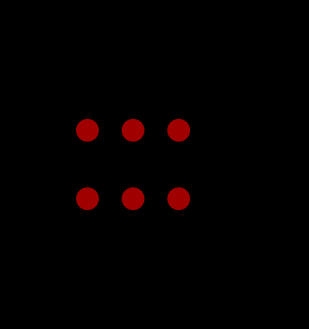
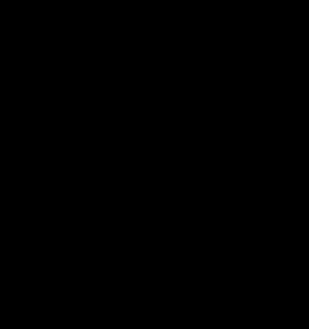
part: (133, 130) -> none
part: (133, 198) -> none

